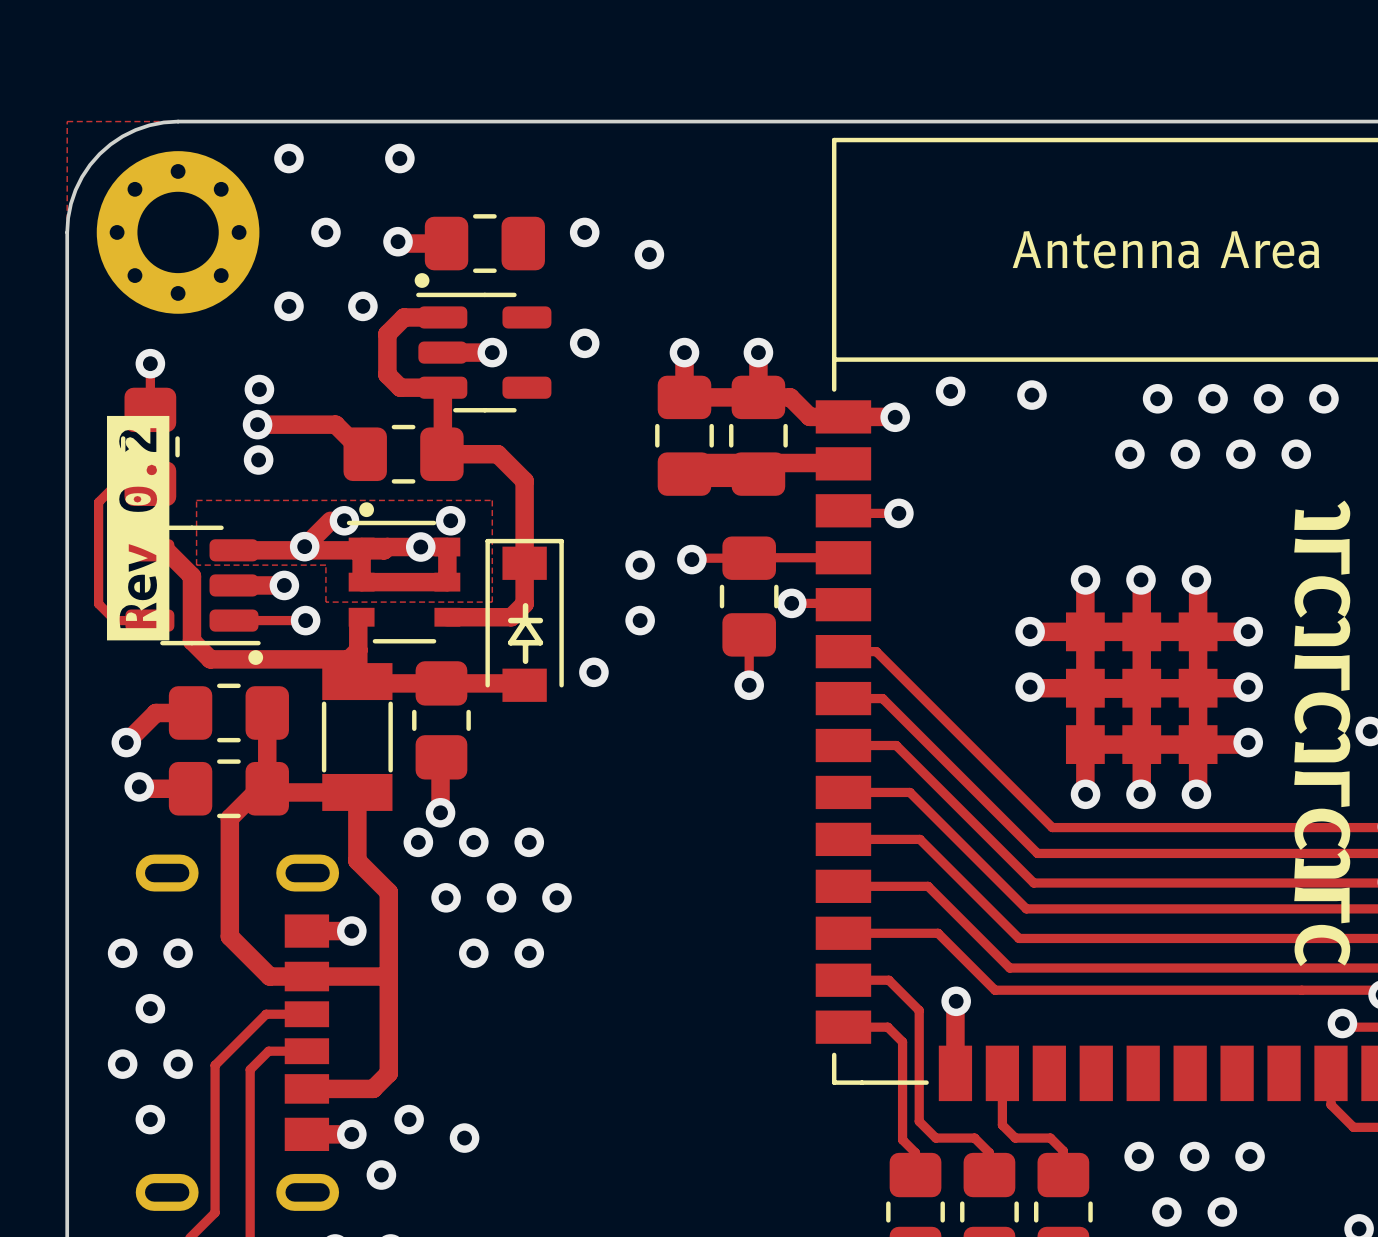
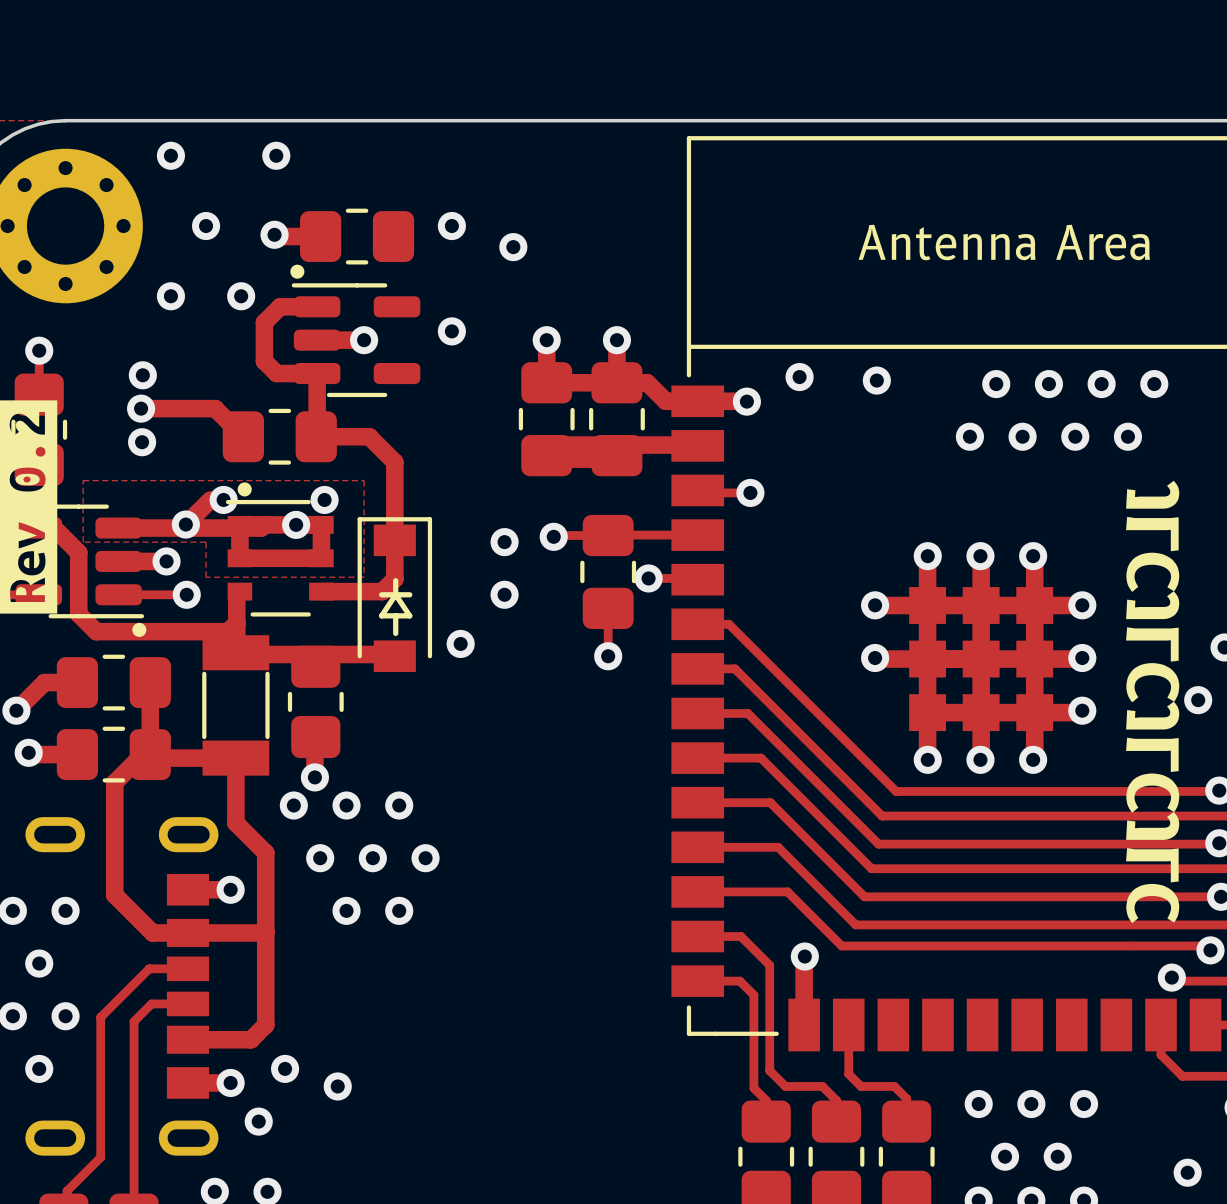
part position: (441, 720) -> (315, 701)

